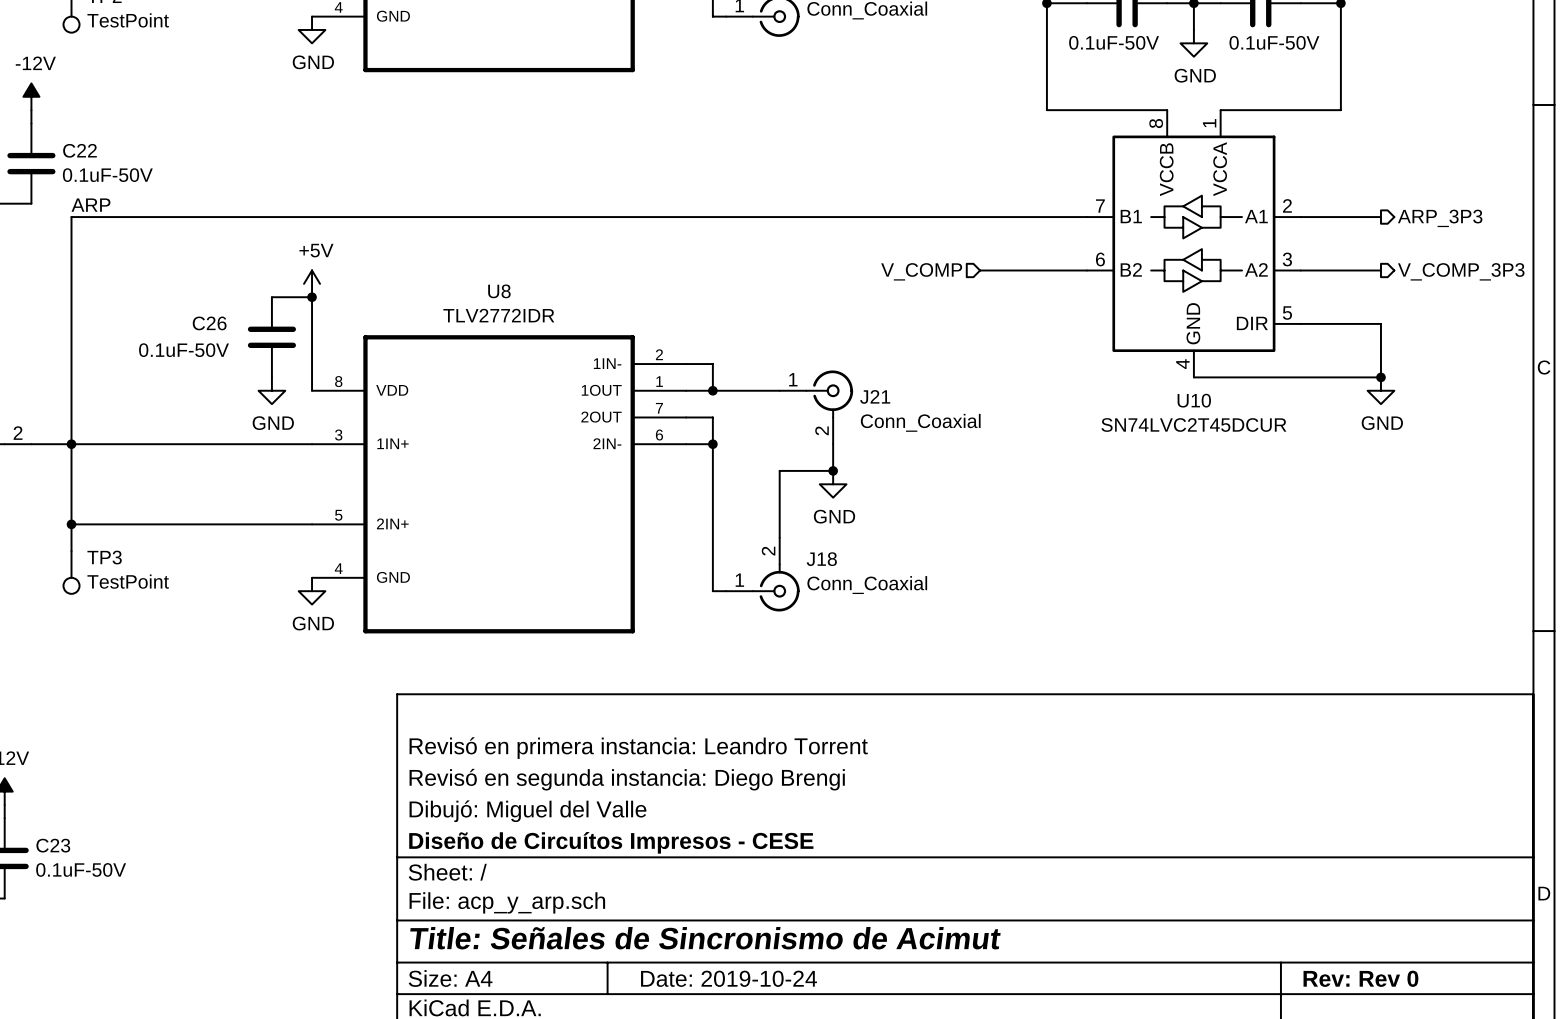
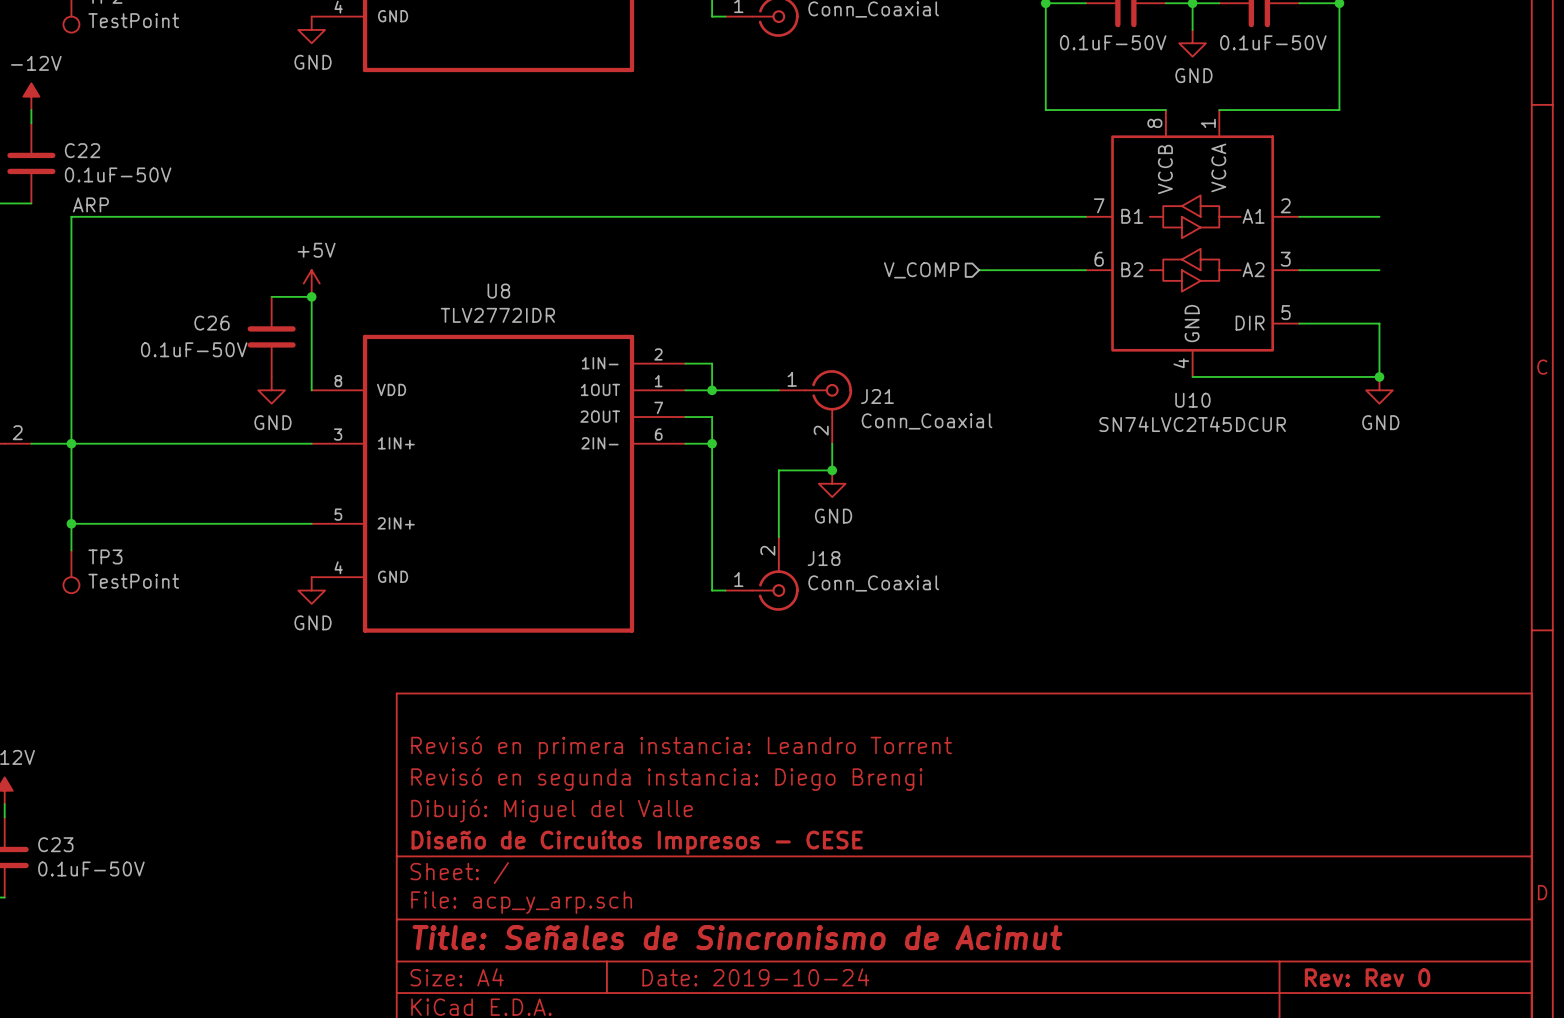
hierarchical label: ARP_3P3 (1440, 218) -> none
hierarchical label: V_COMP_3P3 (1461, 271) -> none

